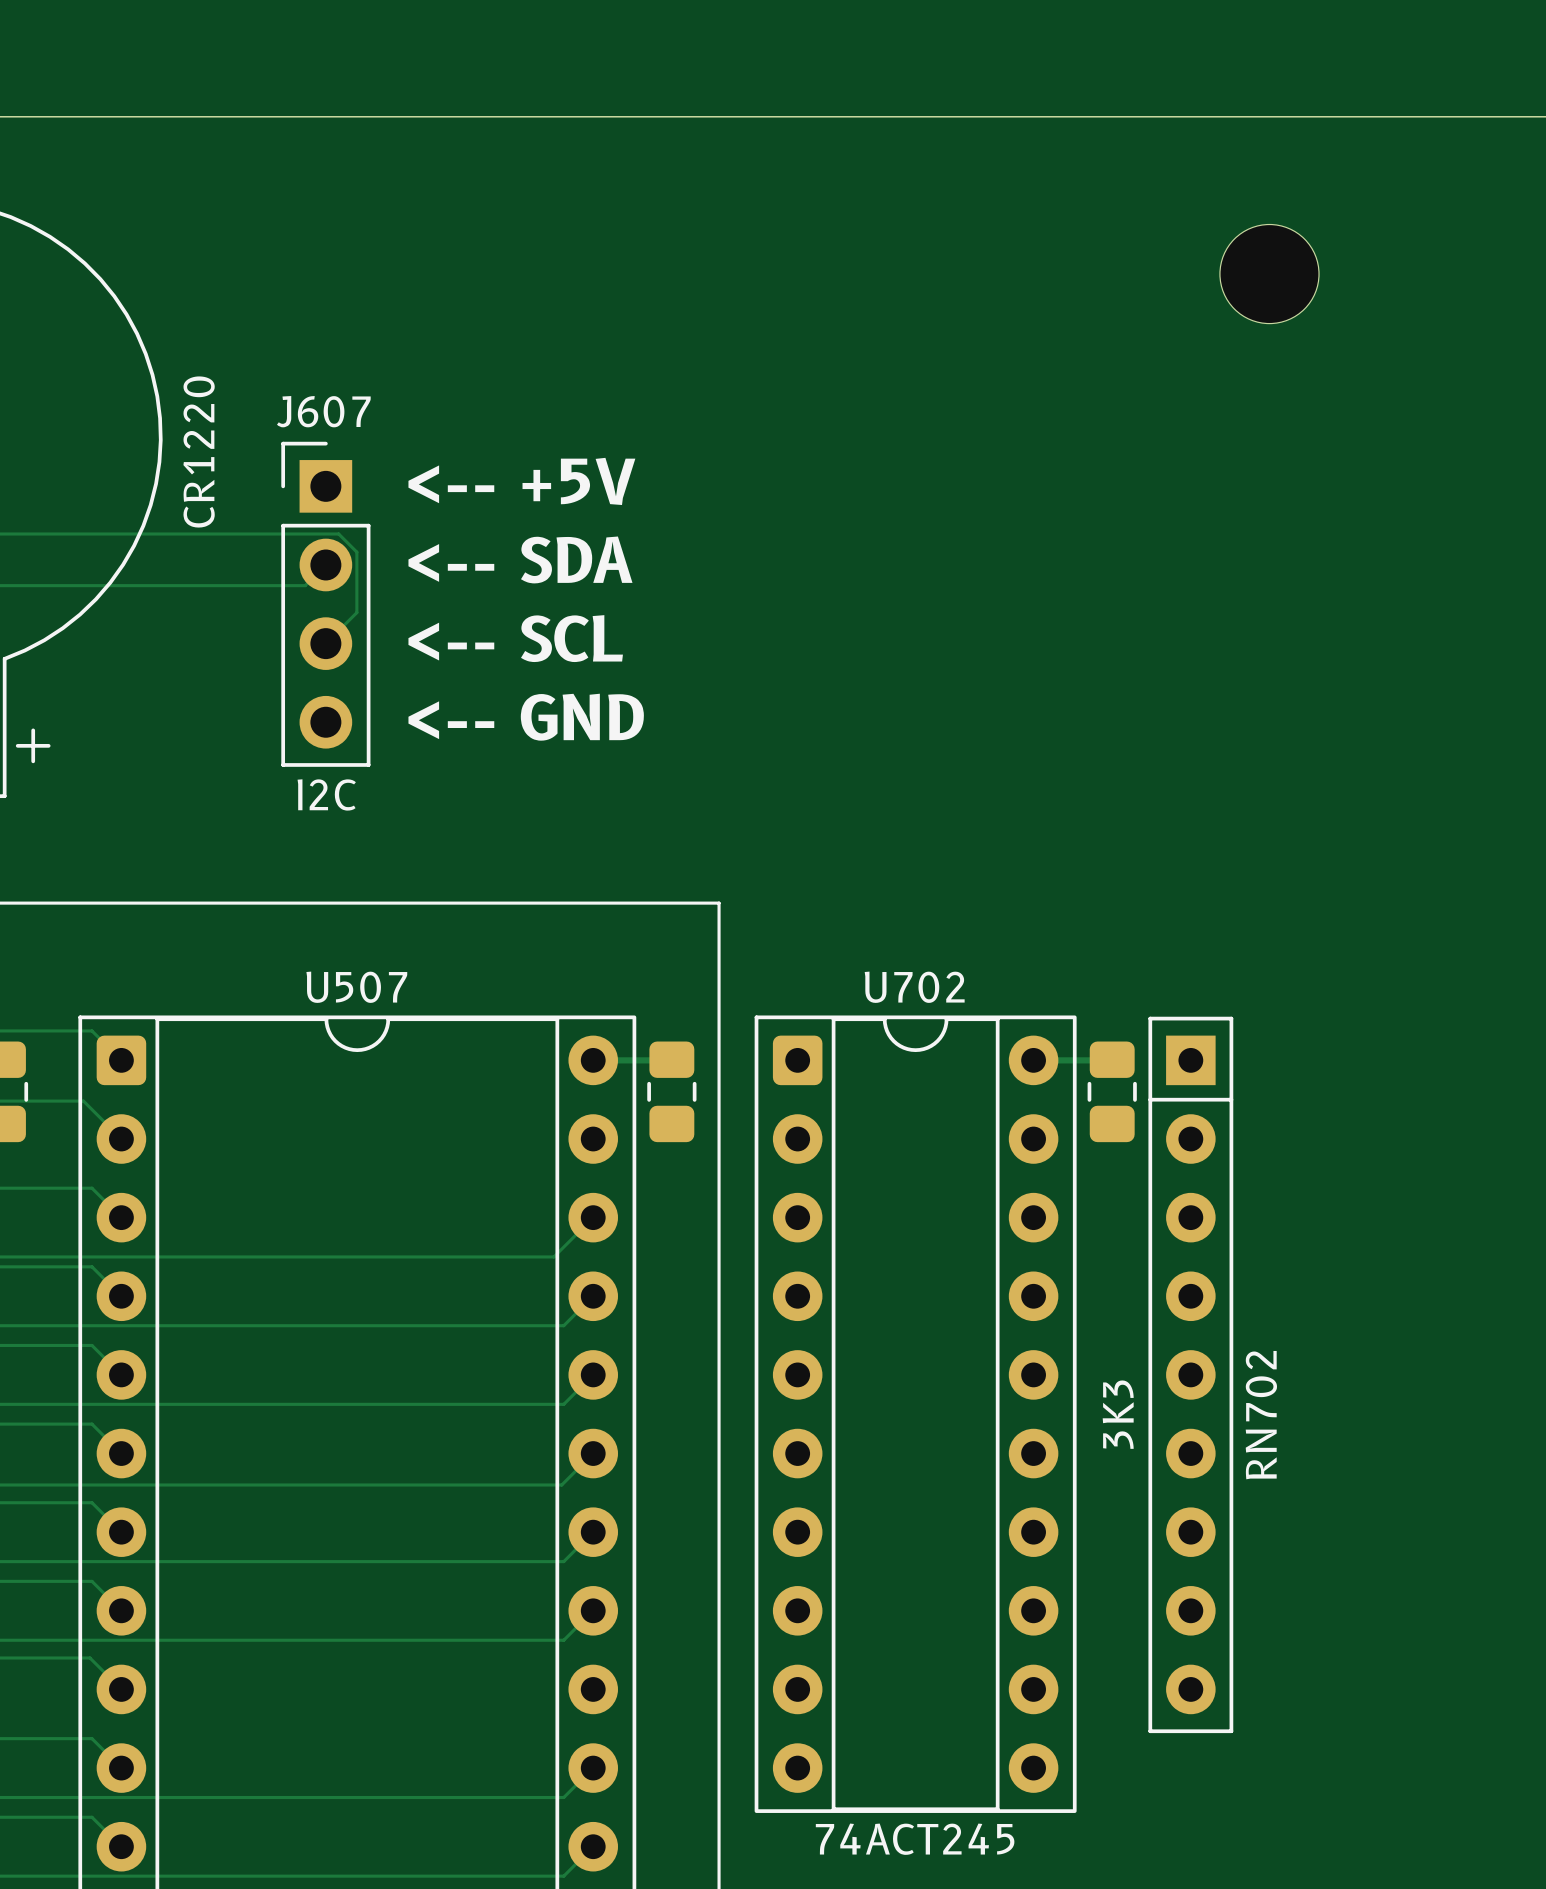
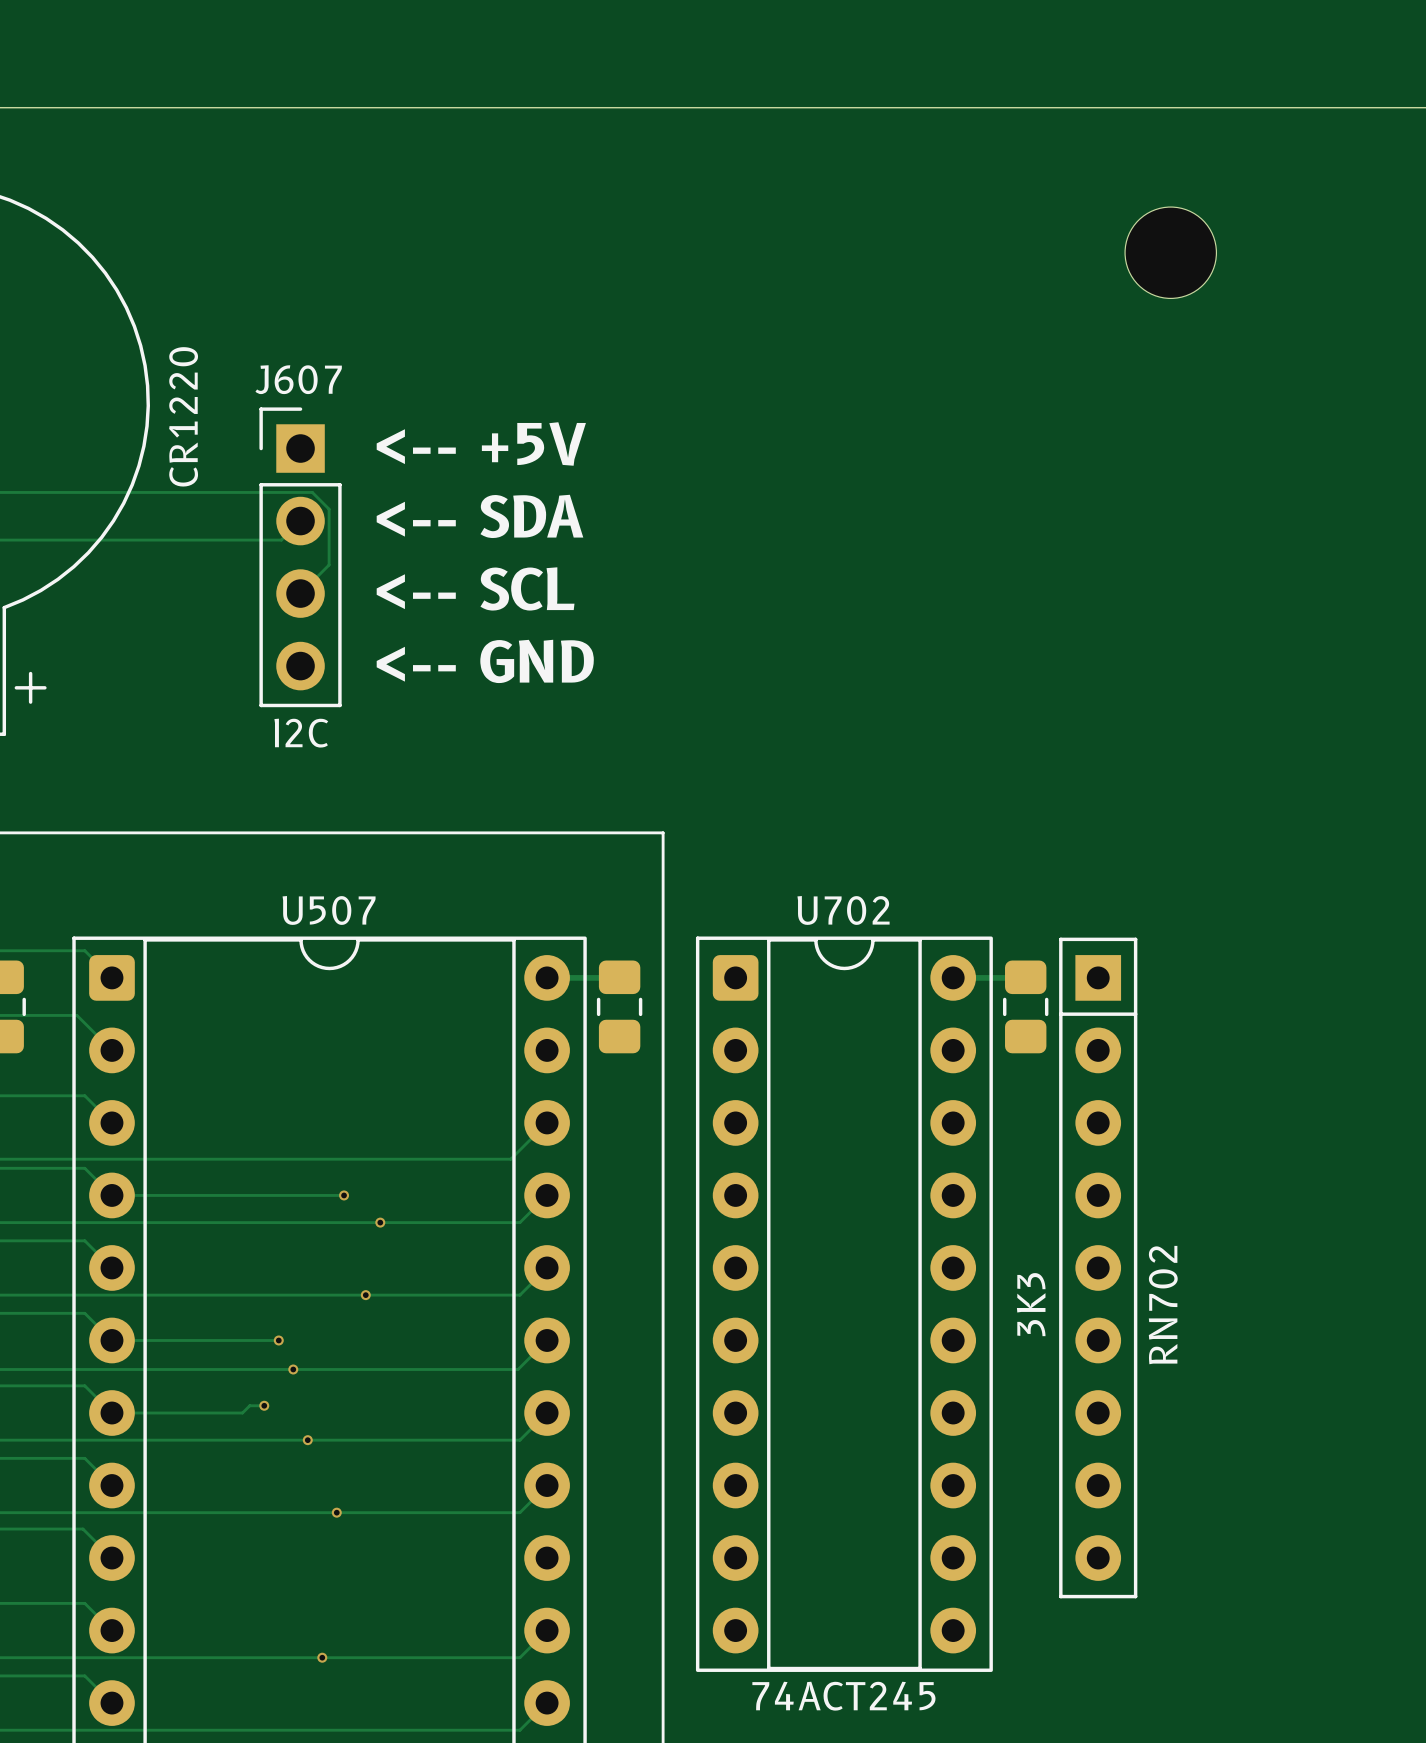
track: none -> (111, 1195) (344, 1195)
via: none -> (344, 1195)
via: none -> (380, 1222)
via: none -> (365, 1295)
track: none -> (111, 1340) (278, 1340)
via: none -> (278, 1340)
via: none -> (293, 1369)
track: none -> (264, 1405) (249, 1405) (242, 1413) (111, 1413)
via: none -> (264, 1405)
via: none -> (307, 1440)
via: none -> (336, 1512)
via: none -> (322, 1657)

